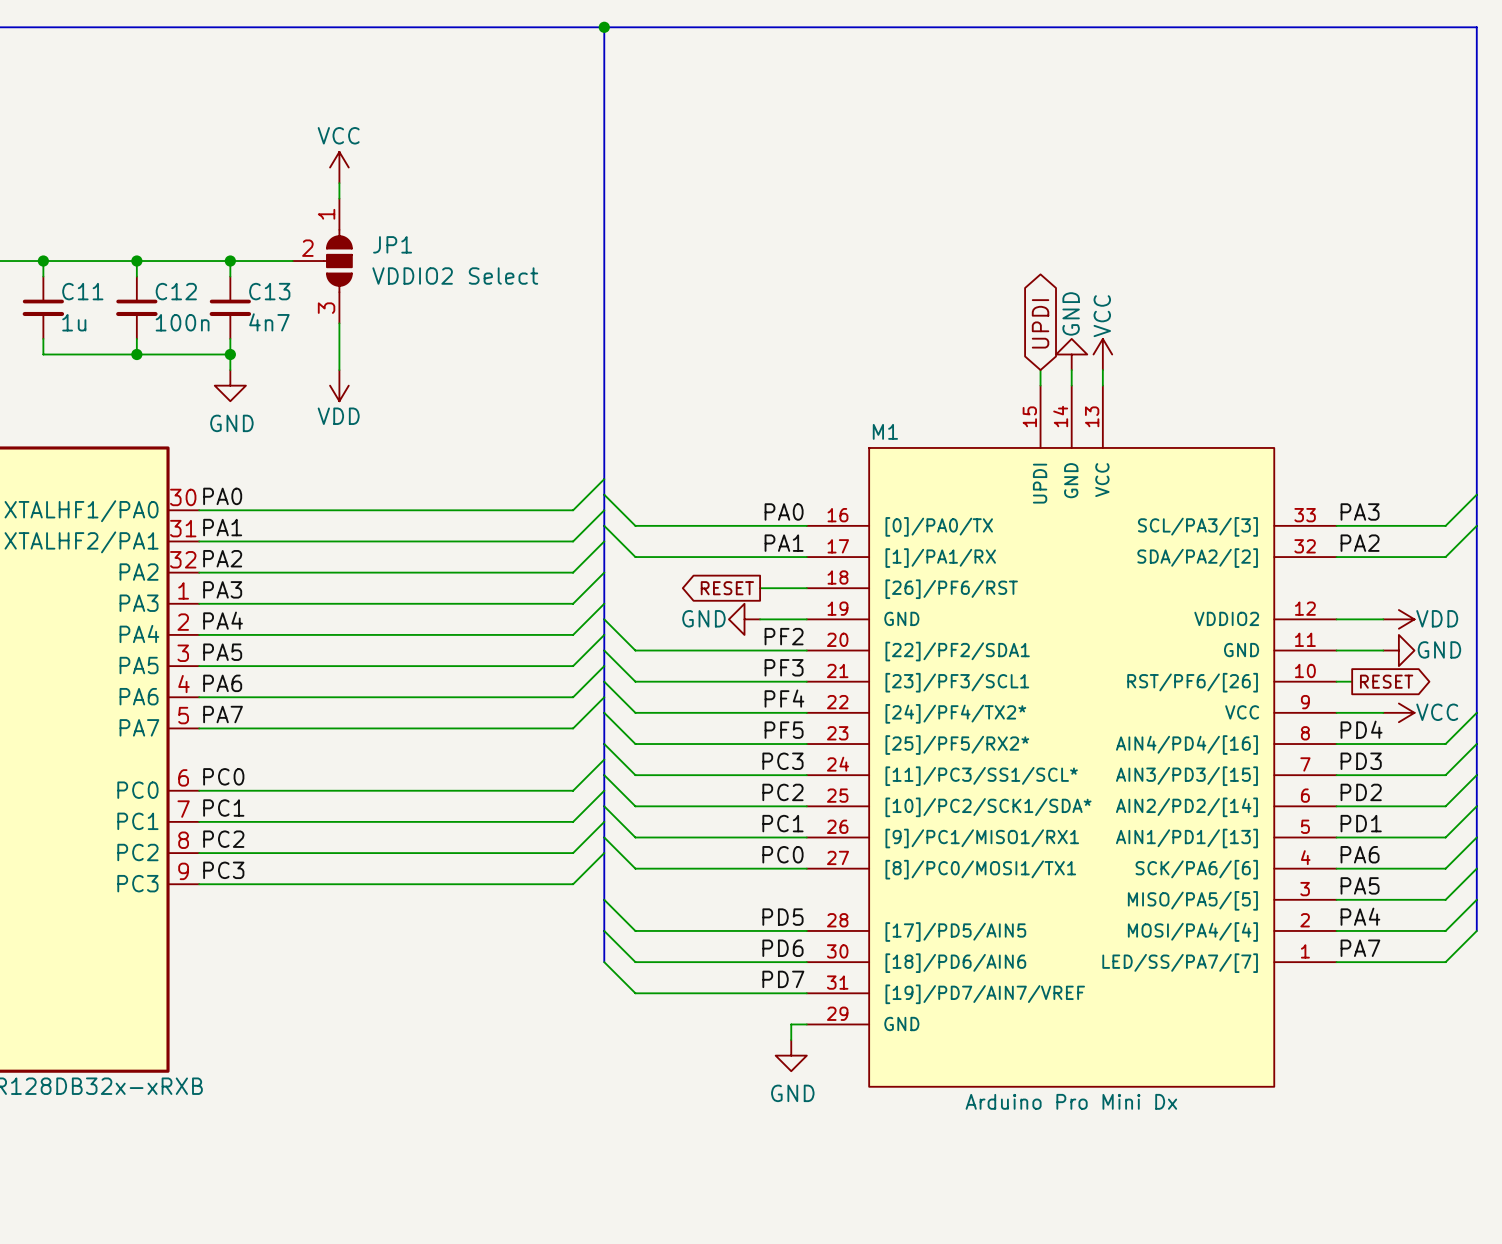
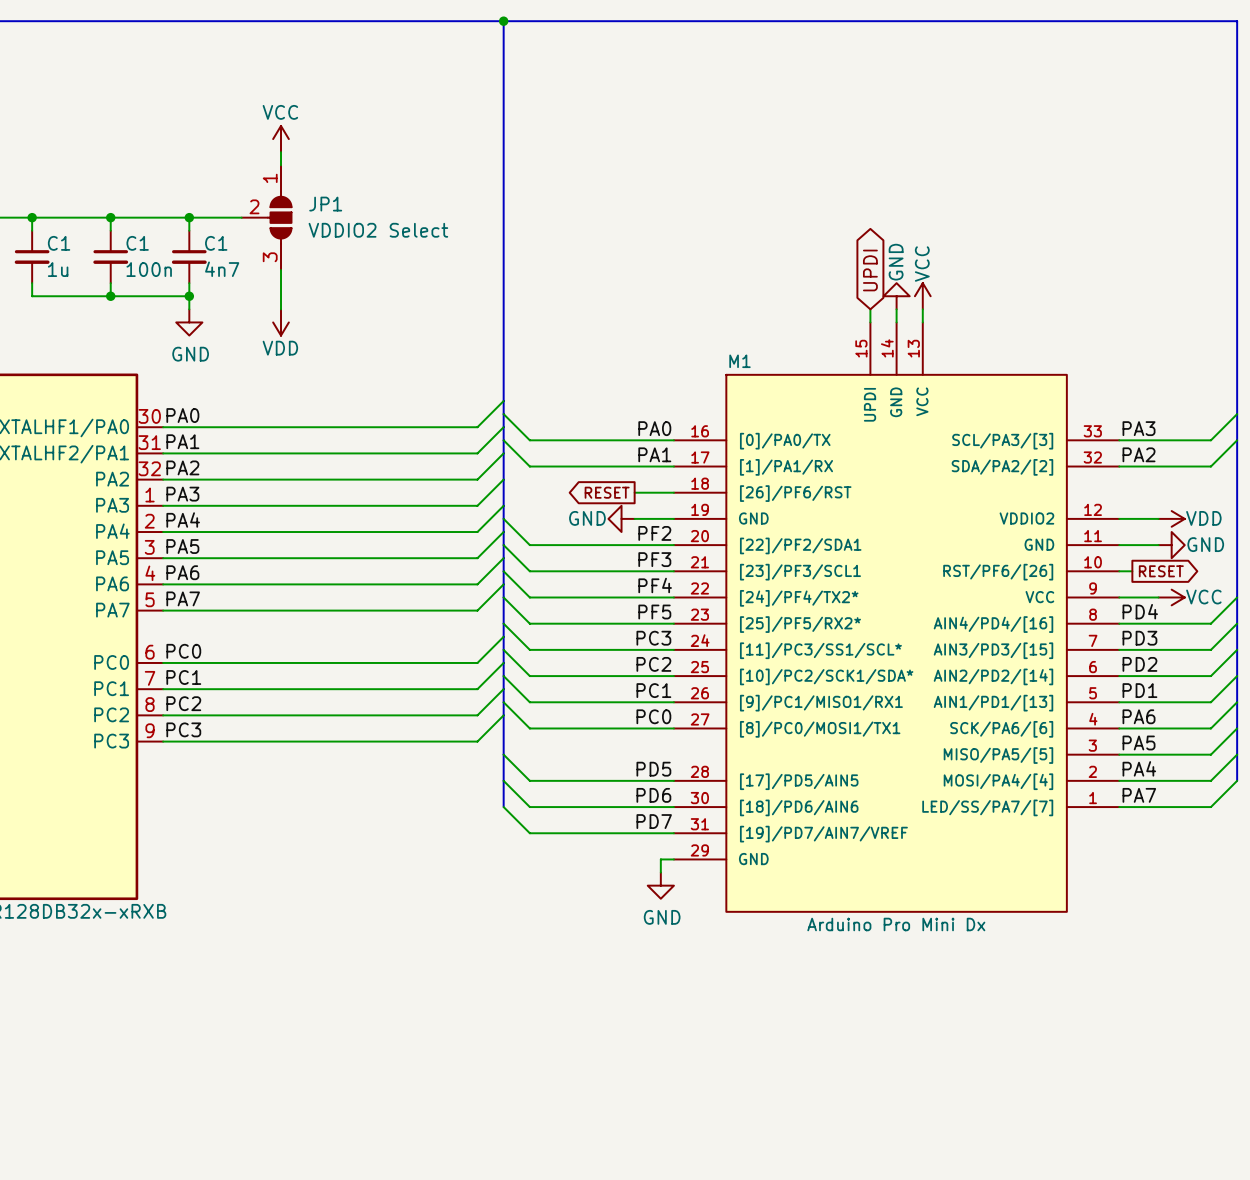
C11 name: C11 (82, 291) -> C1 (59, 243)
C12 name: C12 (176, 291) -> C1 (137, 243)
C13 name: C13 (269, 291) -> C1 (216, 243)

